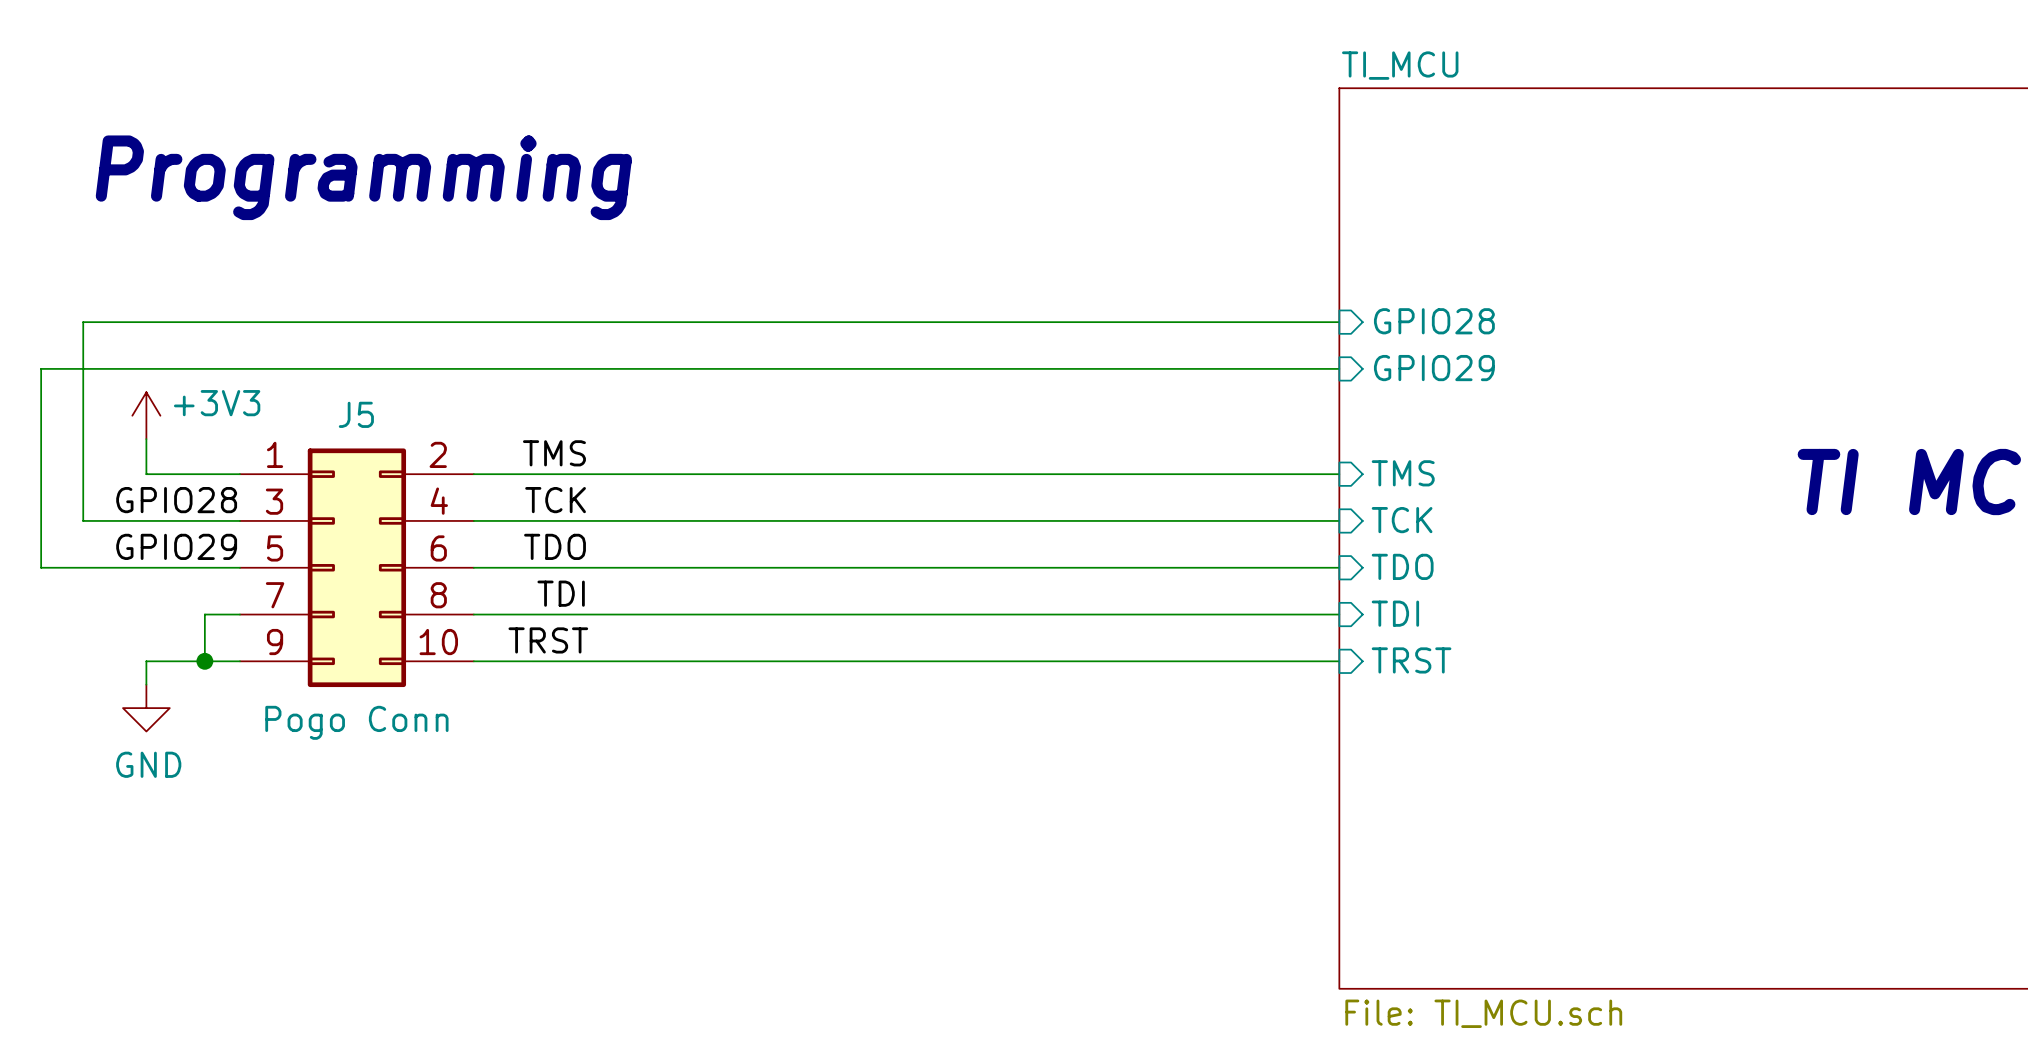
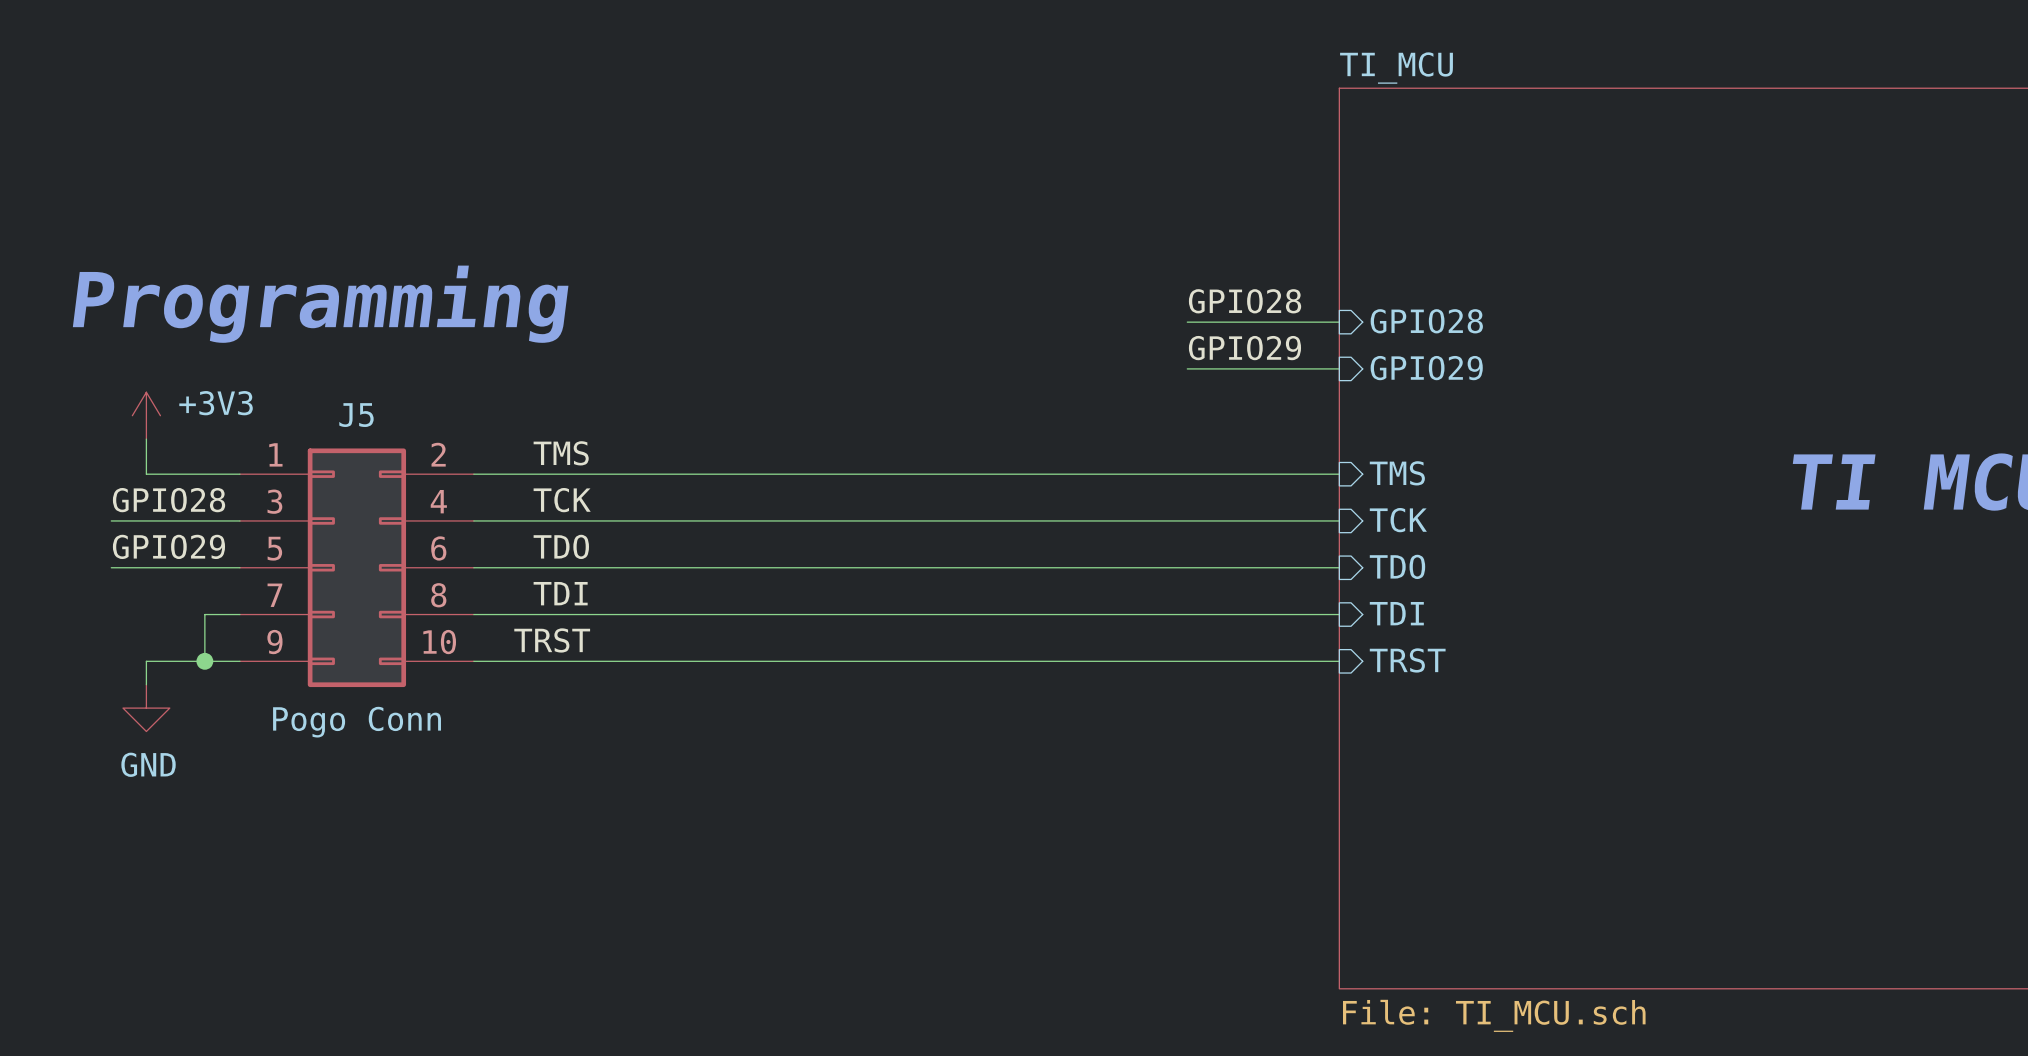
text position: Programming (363, 177) -> Programming (320, 304)
label: none -> GPIO28 (1245, 301)
wire: (1187, 322) (83, 322) (83, 520) (111, 520) -> none
label: none -> GPIO29 (1244, 348)
wire: (1187, 368) (41, 368) (41, 567) (111, 567) -> none

